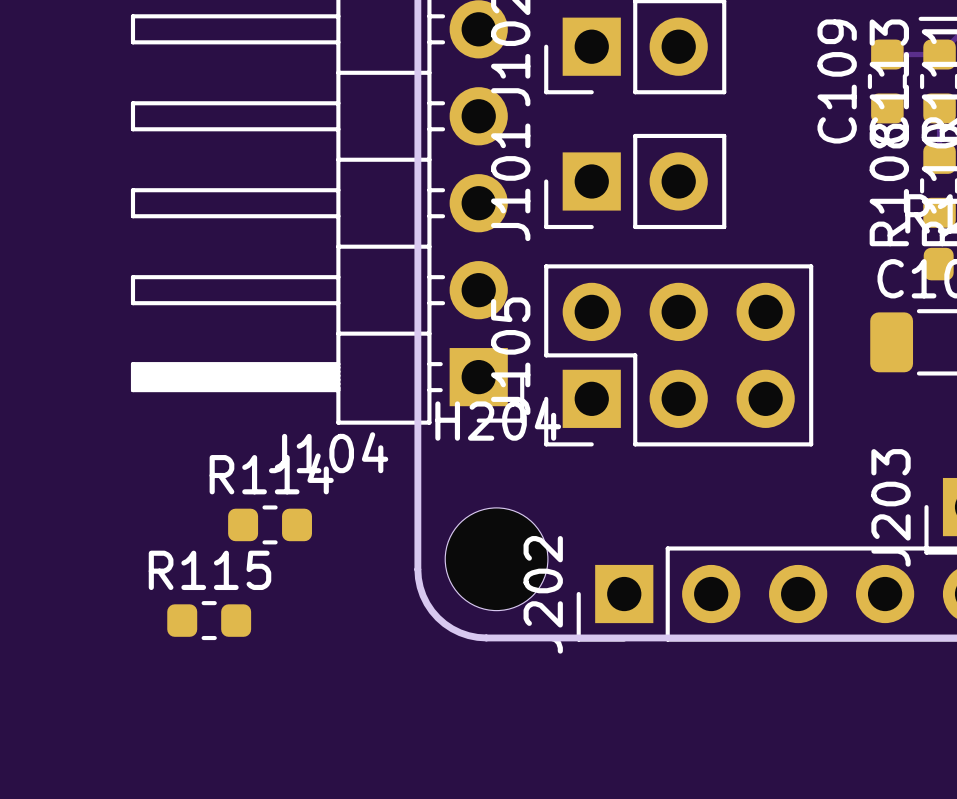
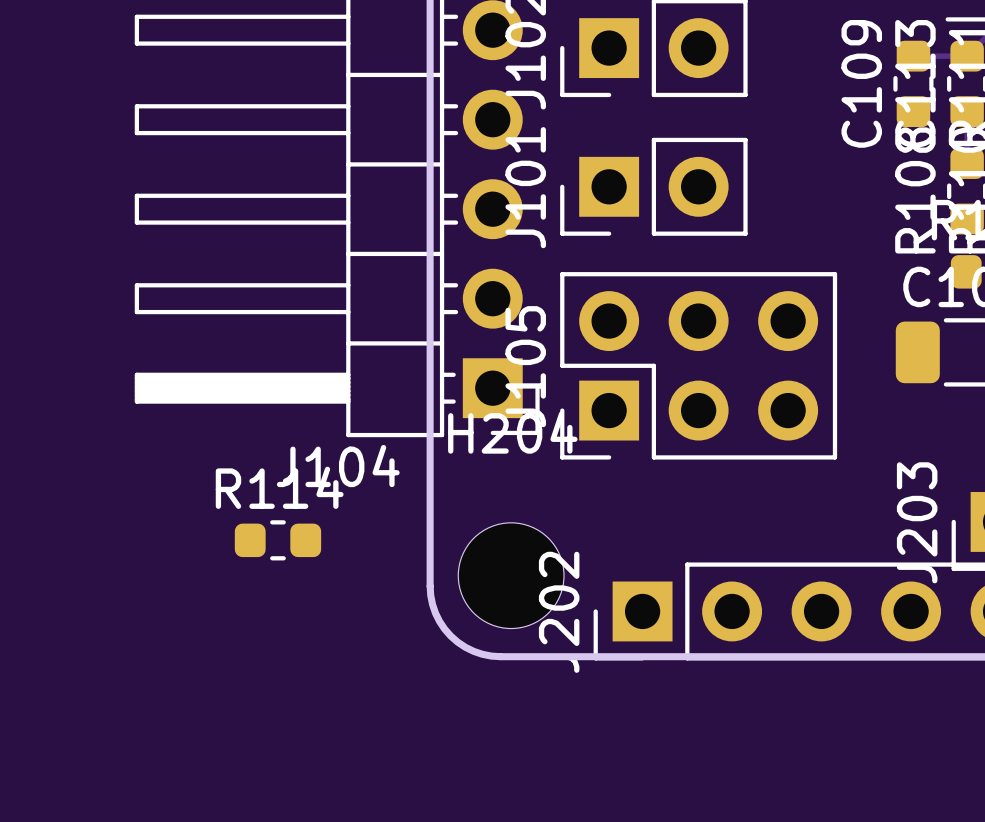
R115: (209, 620) -> none

